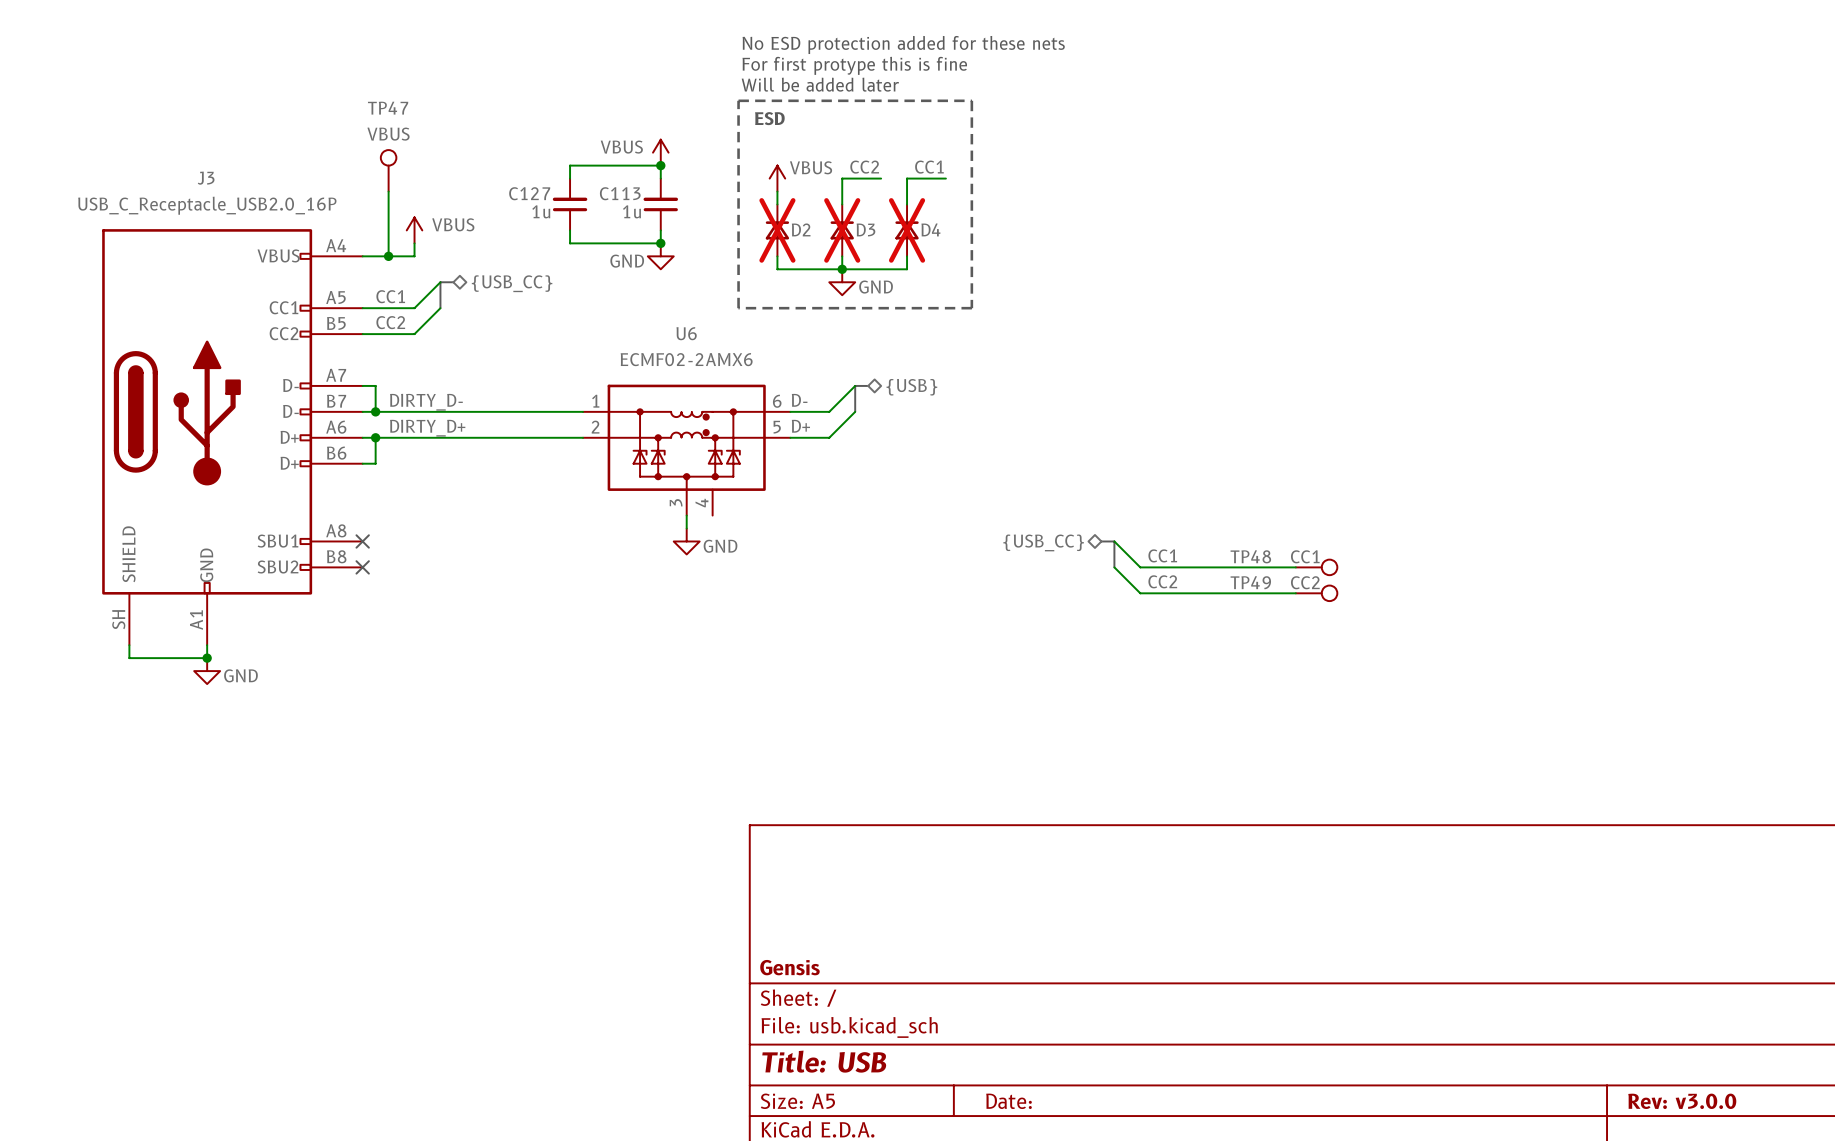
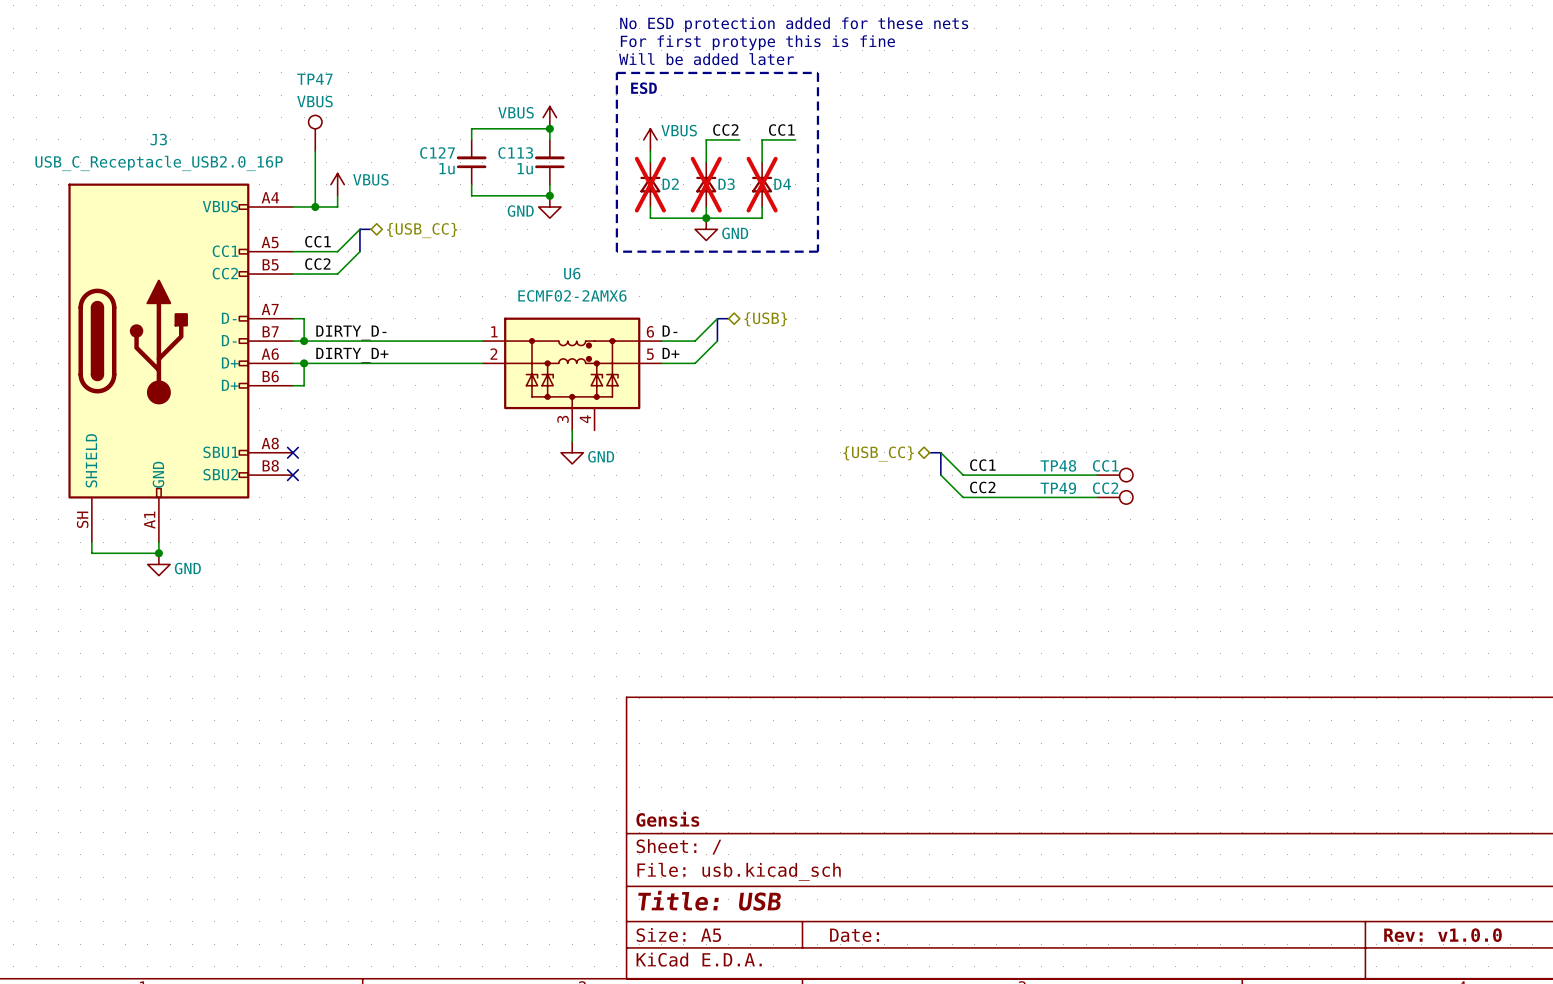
title block: Rev: v3.0.0 (1682, 1101) -> Rev: v1.0.0 (1442, 935)

